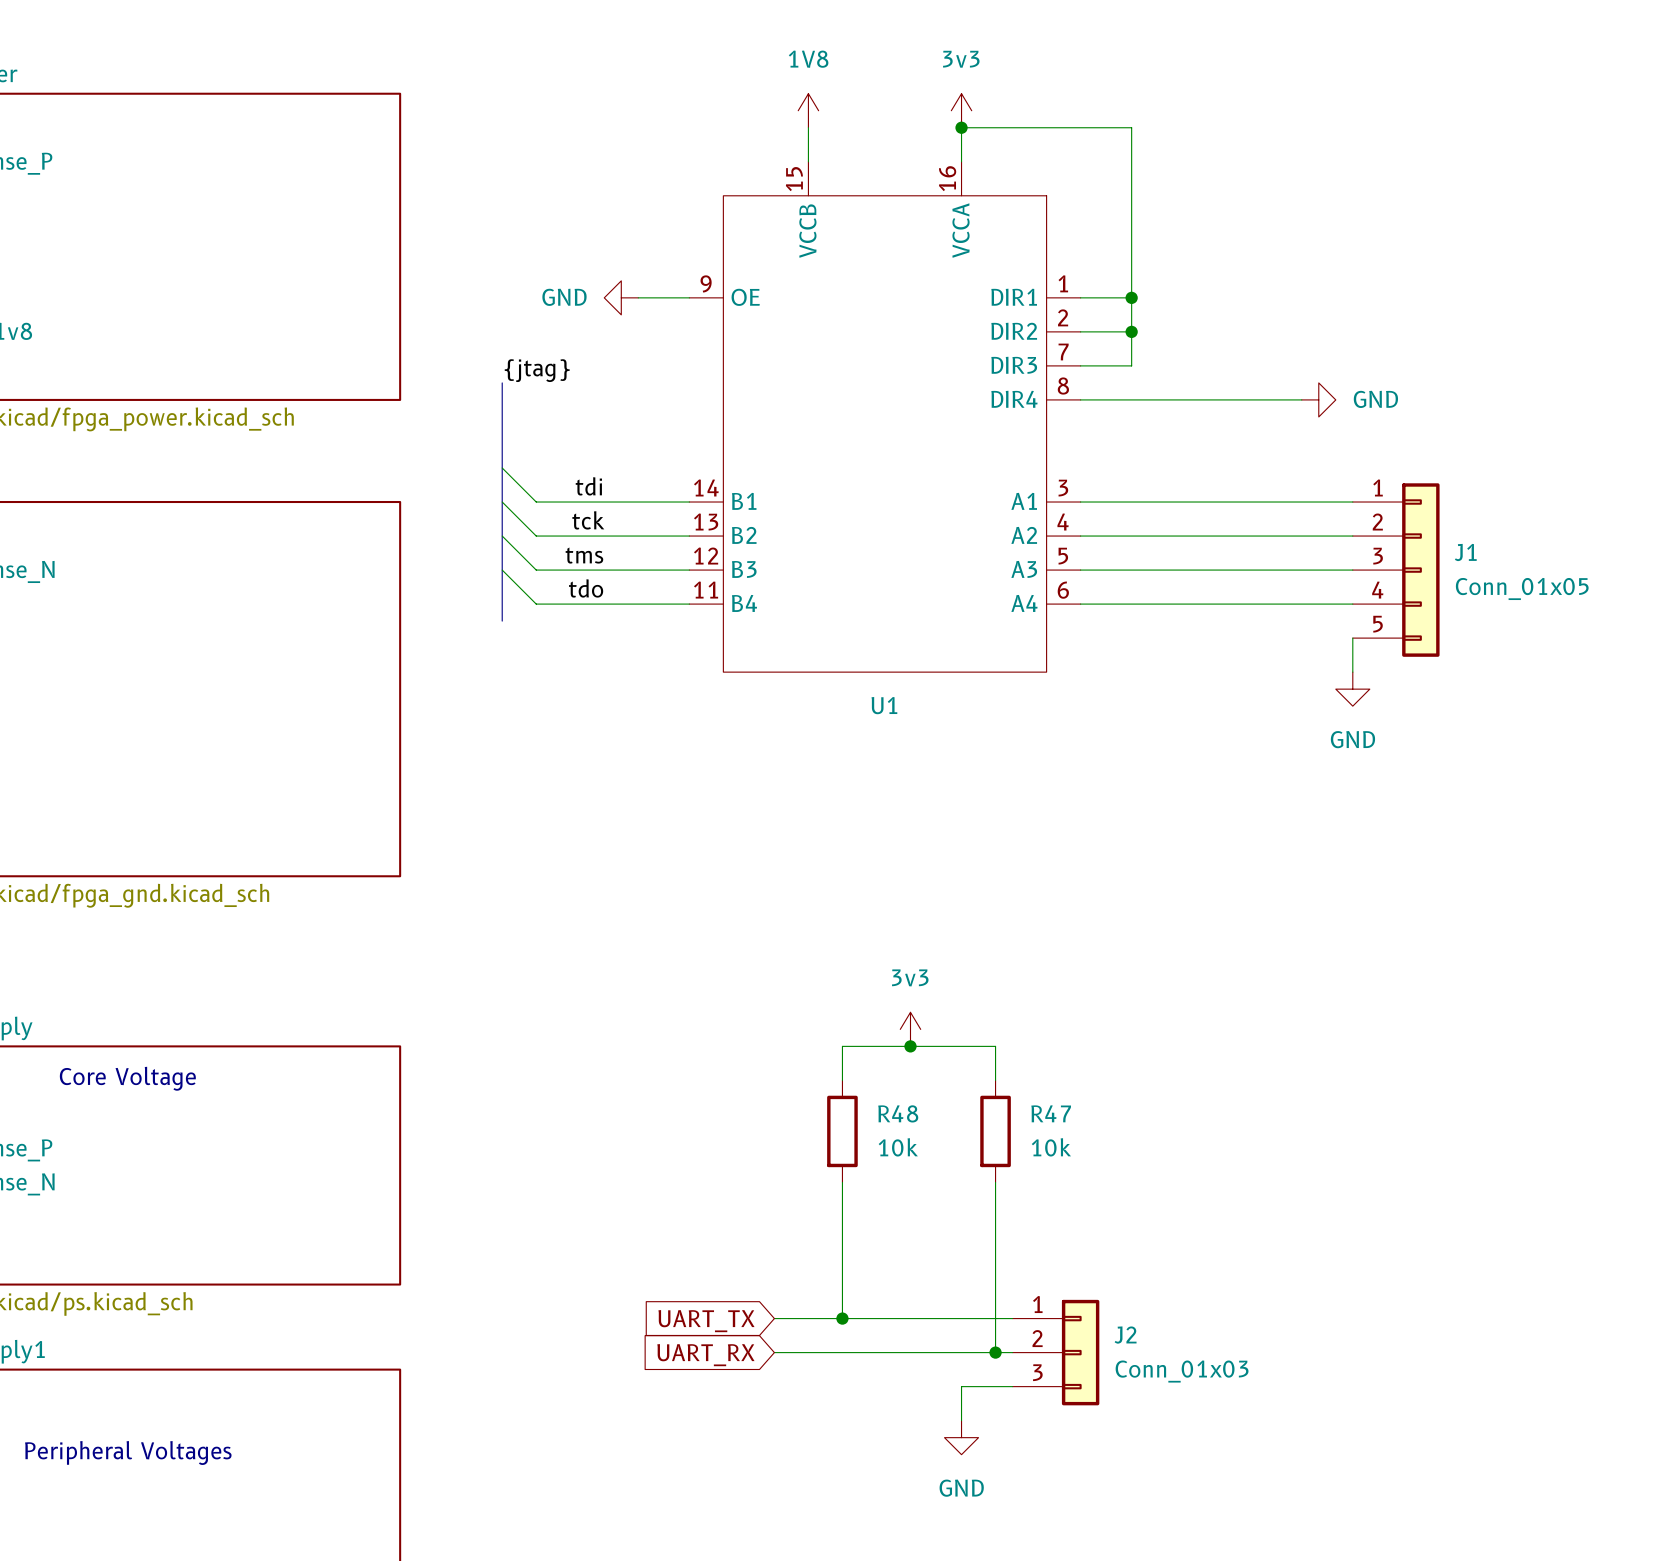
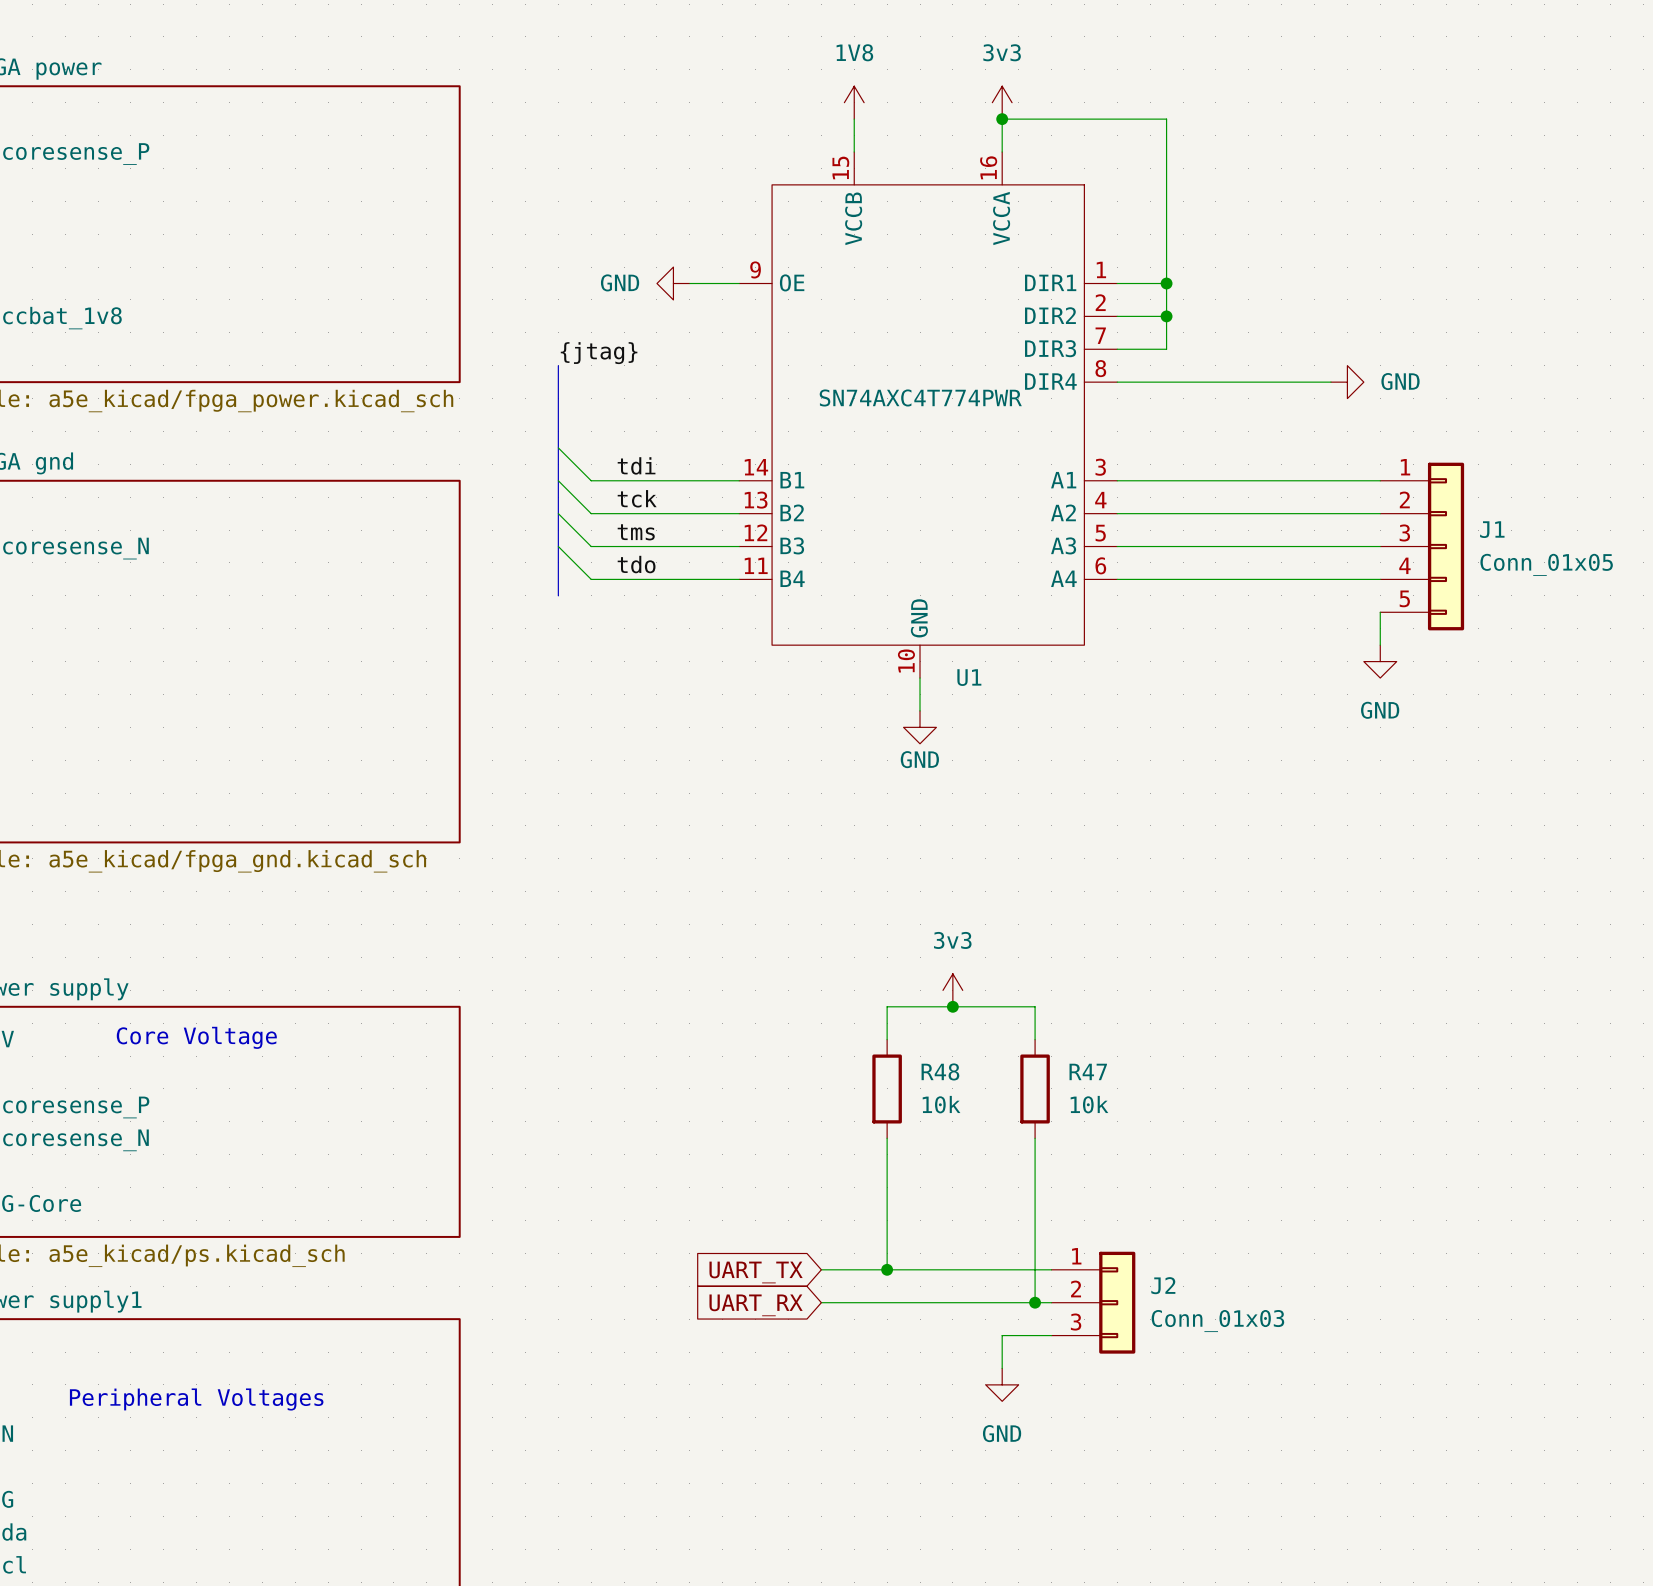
U1 symbol: [689, 161, 1081, 673] -> [739, 152, 1118, 679]
U1 value: none -> SN74AXC4T774PWR (920, 397)
U1 name position: U1 (884, 705) -> U1 (969, 677)
wire: none -> (920, 678) (920, 710)
power symbol: none -> GND (920, 727)

